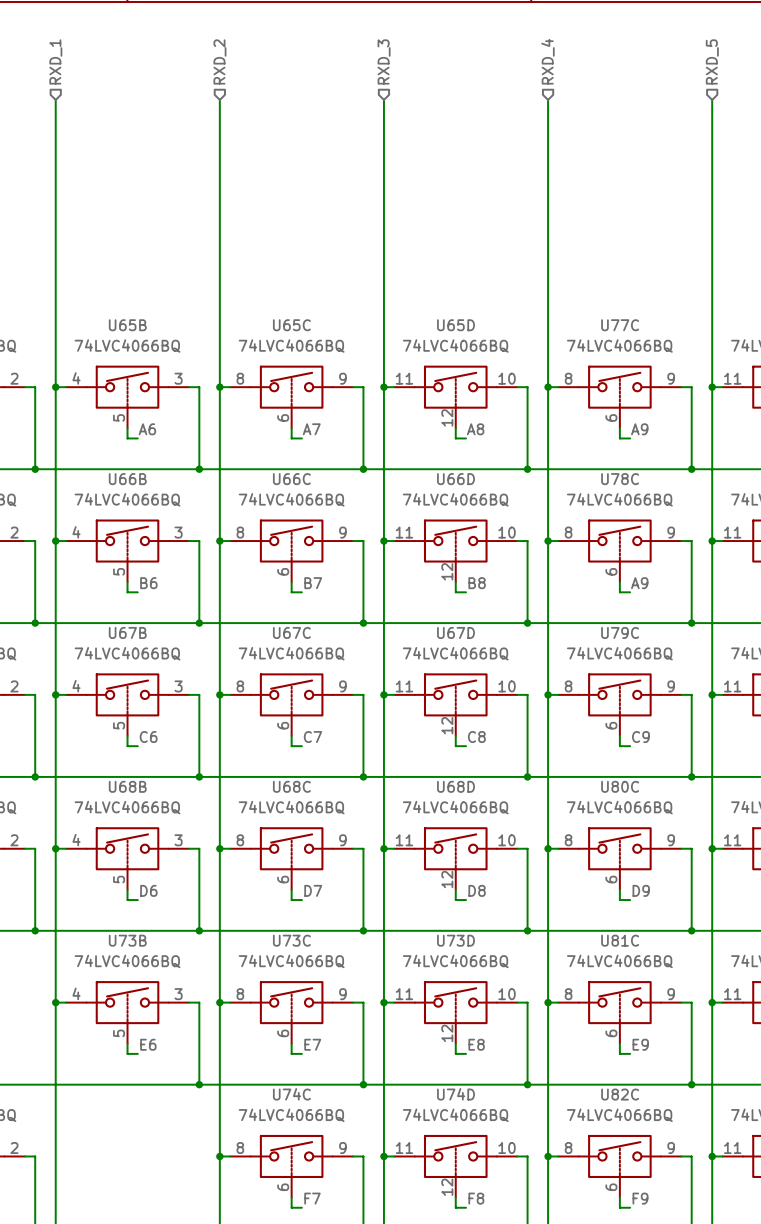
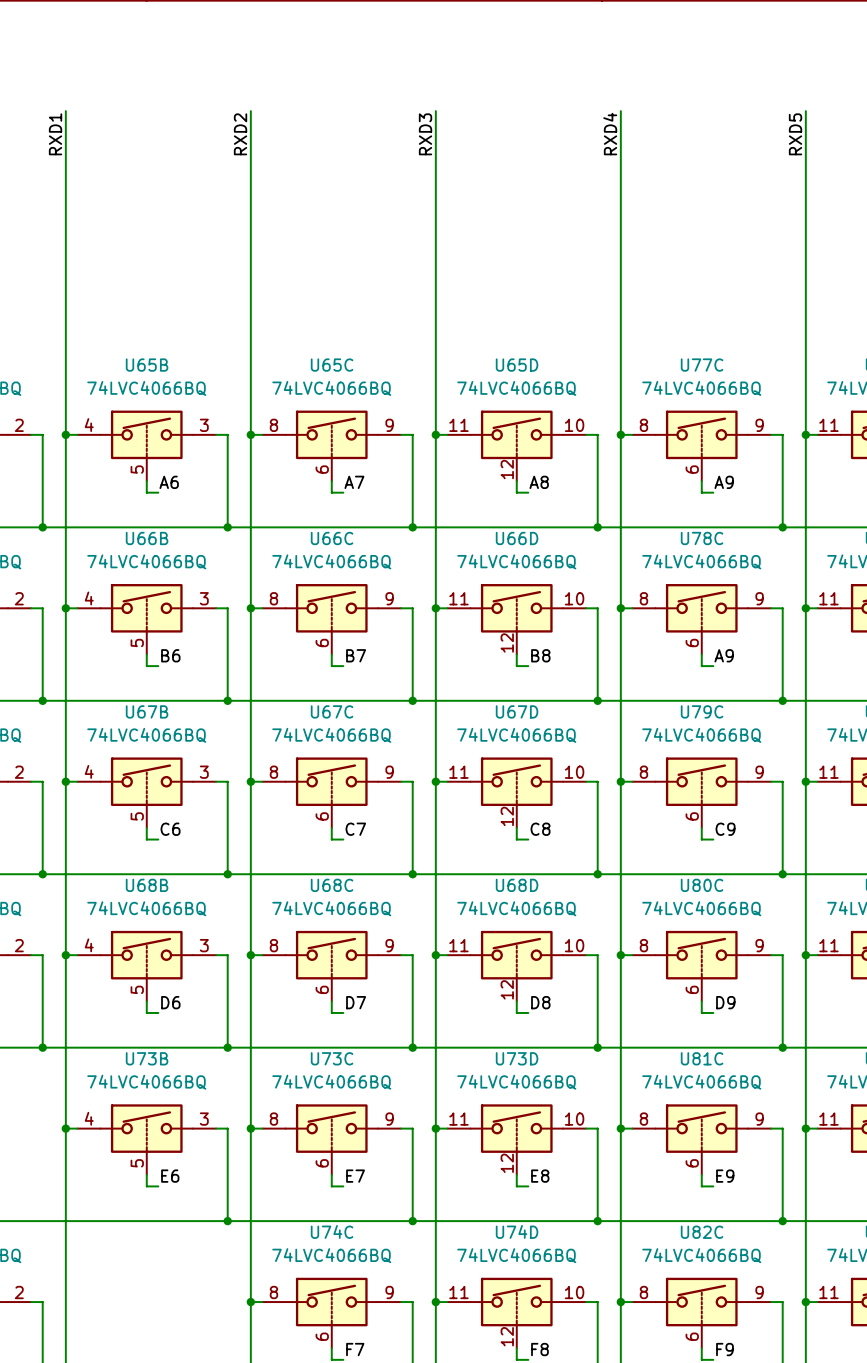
hierarchical label: RXD_1 (55, 61) -> none
hierarchical label: RXD_2 (219, 61) -> none
hierarchical label: RXD_3 (384, 61) -> none
hierarchical label: RXD_4 (547, 61) -> none
hierarchical label: RXD_5 (712, 61) -> none
label: none -> RXD1 (55, 134)
label: none -> RXD2 (240, 134)
label: none -> RXD3 (425, 134)
label: none -> RXD4 (610, 134)
label: none -> RXD5 (795, 134)

